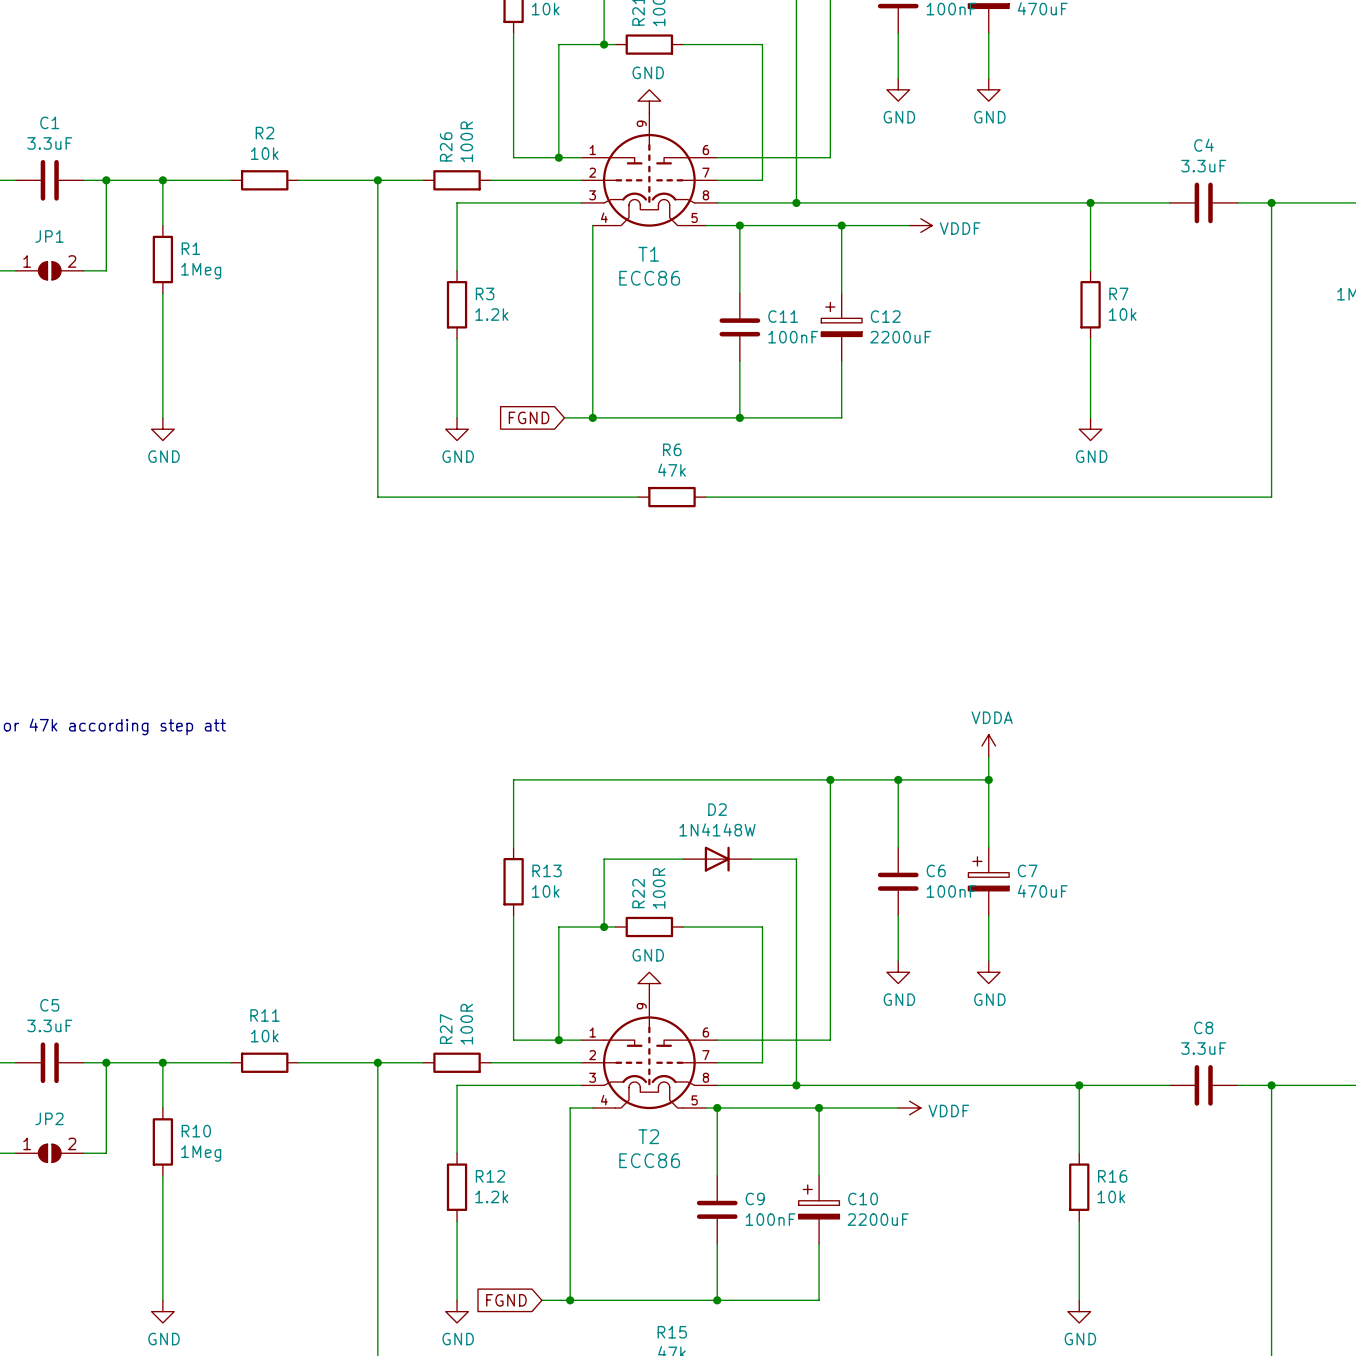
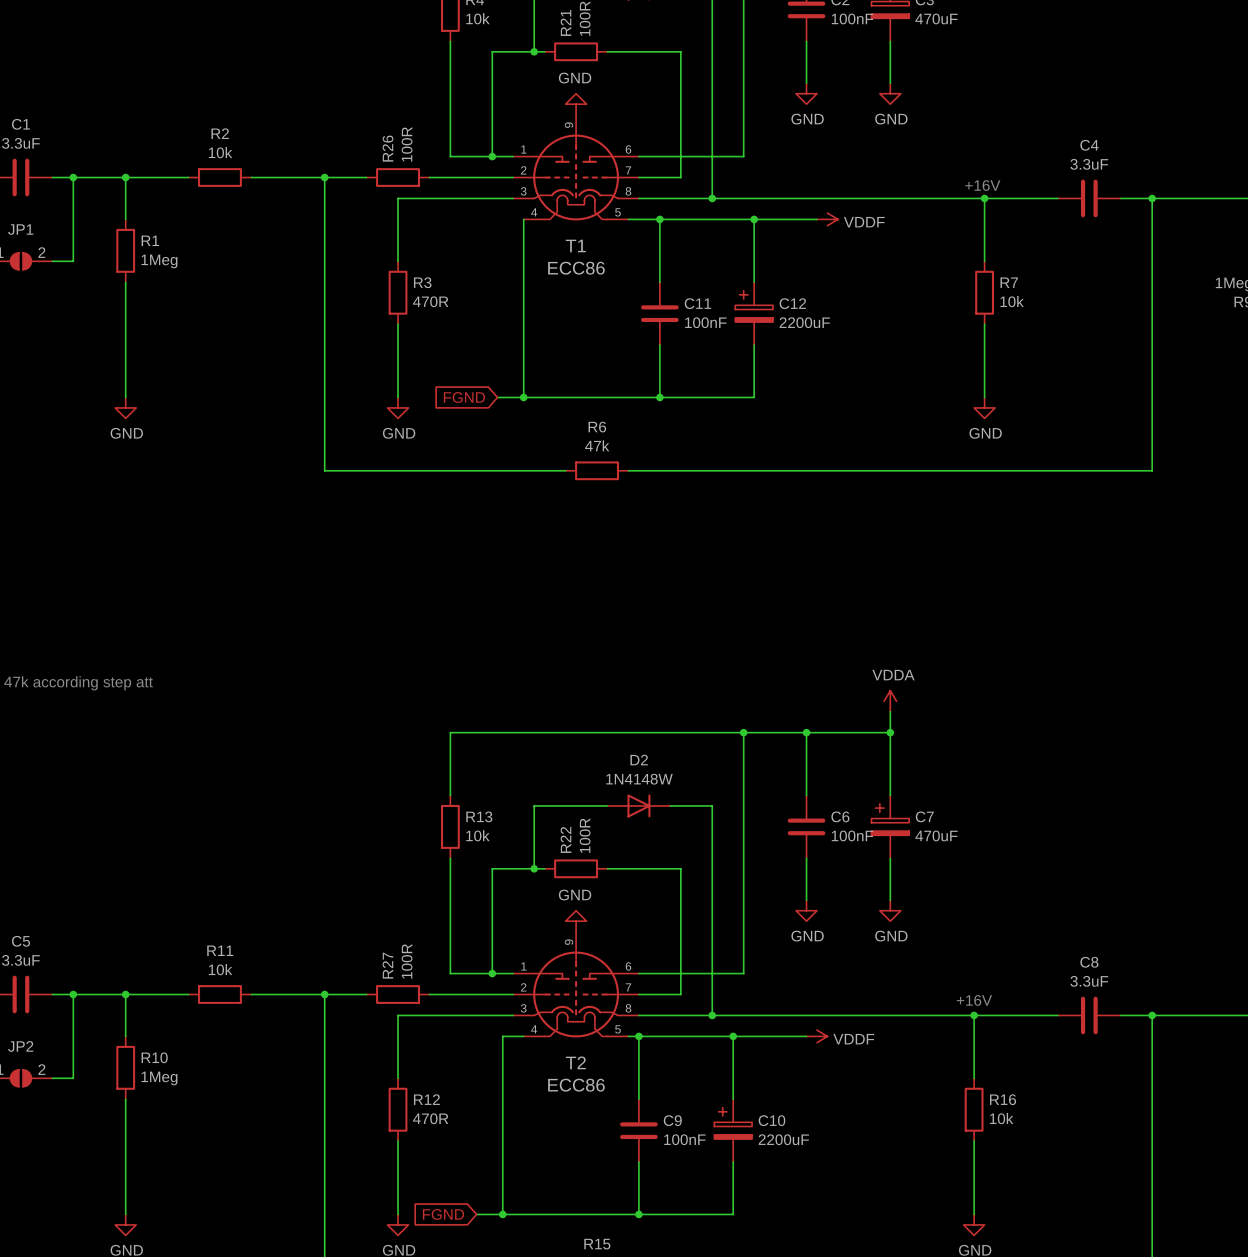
text: none -> +16V (982, 185)
R3 value: 1.2k (491, 314) -> 470R (430, 301)
text: none -> +16V (974, 1000)
R12 value: 1.2k (491, 1196) -> 470R (430, 1118)

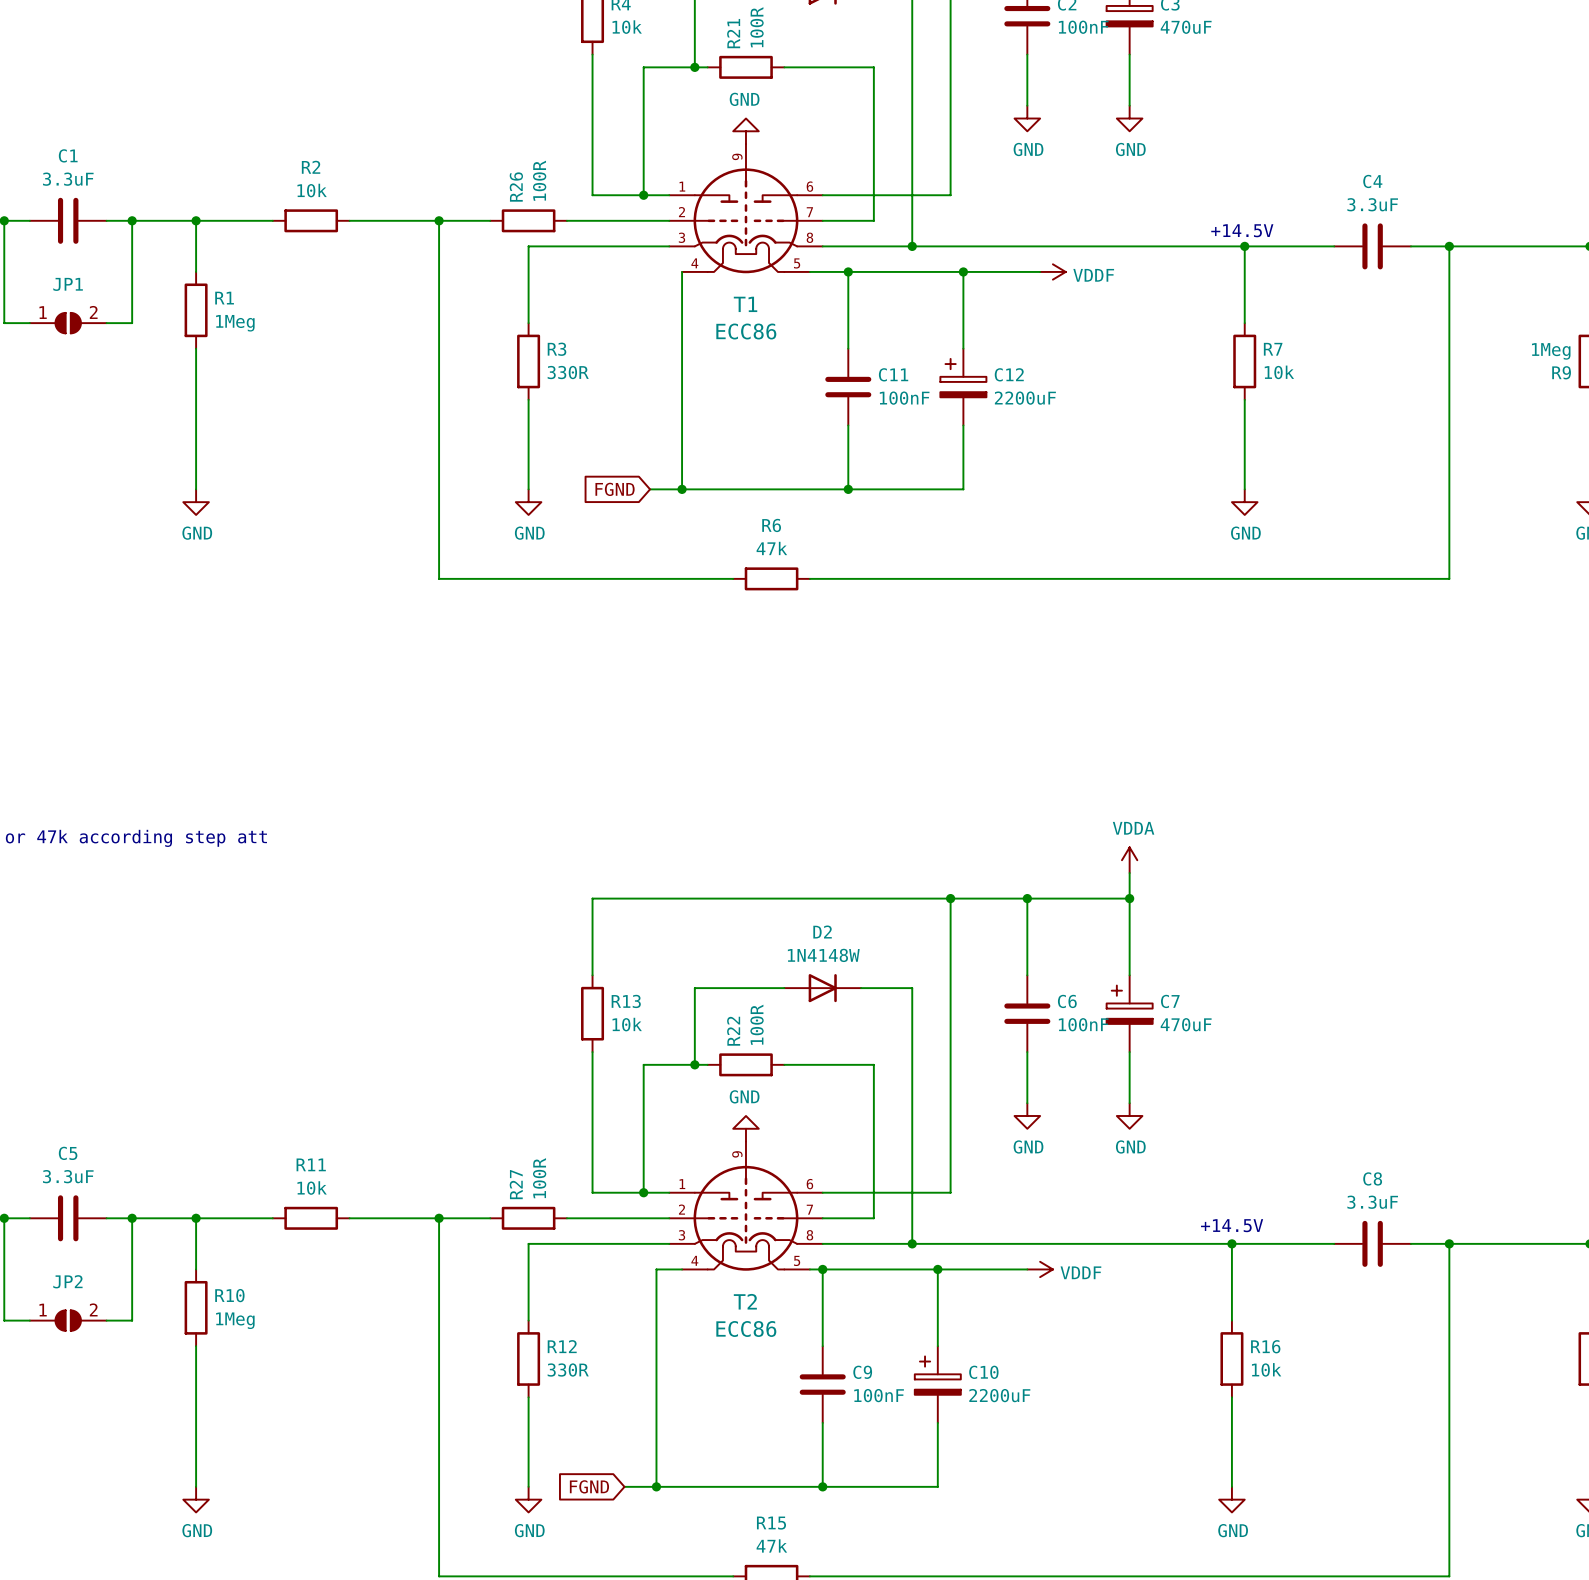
text: +16V (982, 185) -> +14.5V (1242, 230)
R3 value: 470R (430, 301) -> 330R (568, 372)
text: +16V (974, 1000) -> +14.5V (1232, 1225)
R12 value: 470R (430, 1118) -> 330R (568, 1370)

